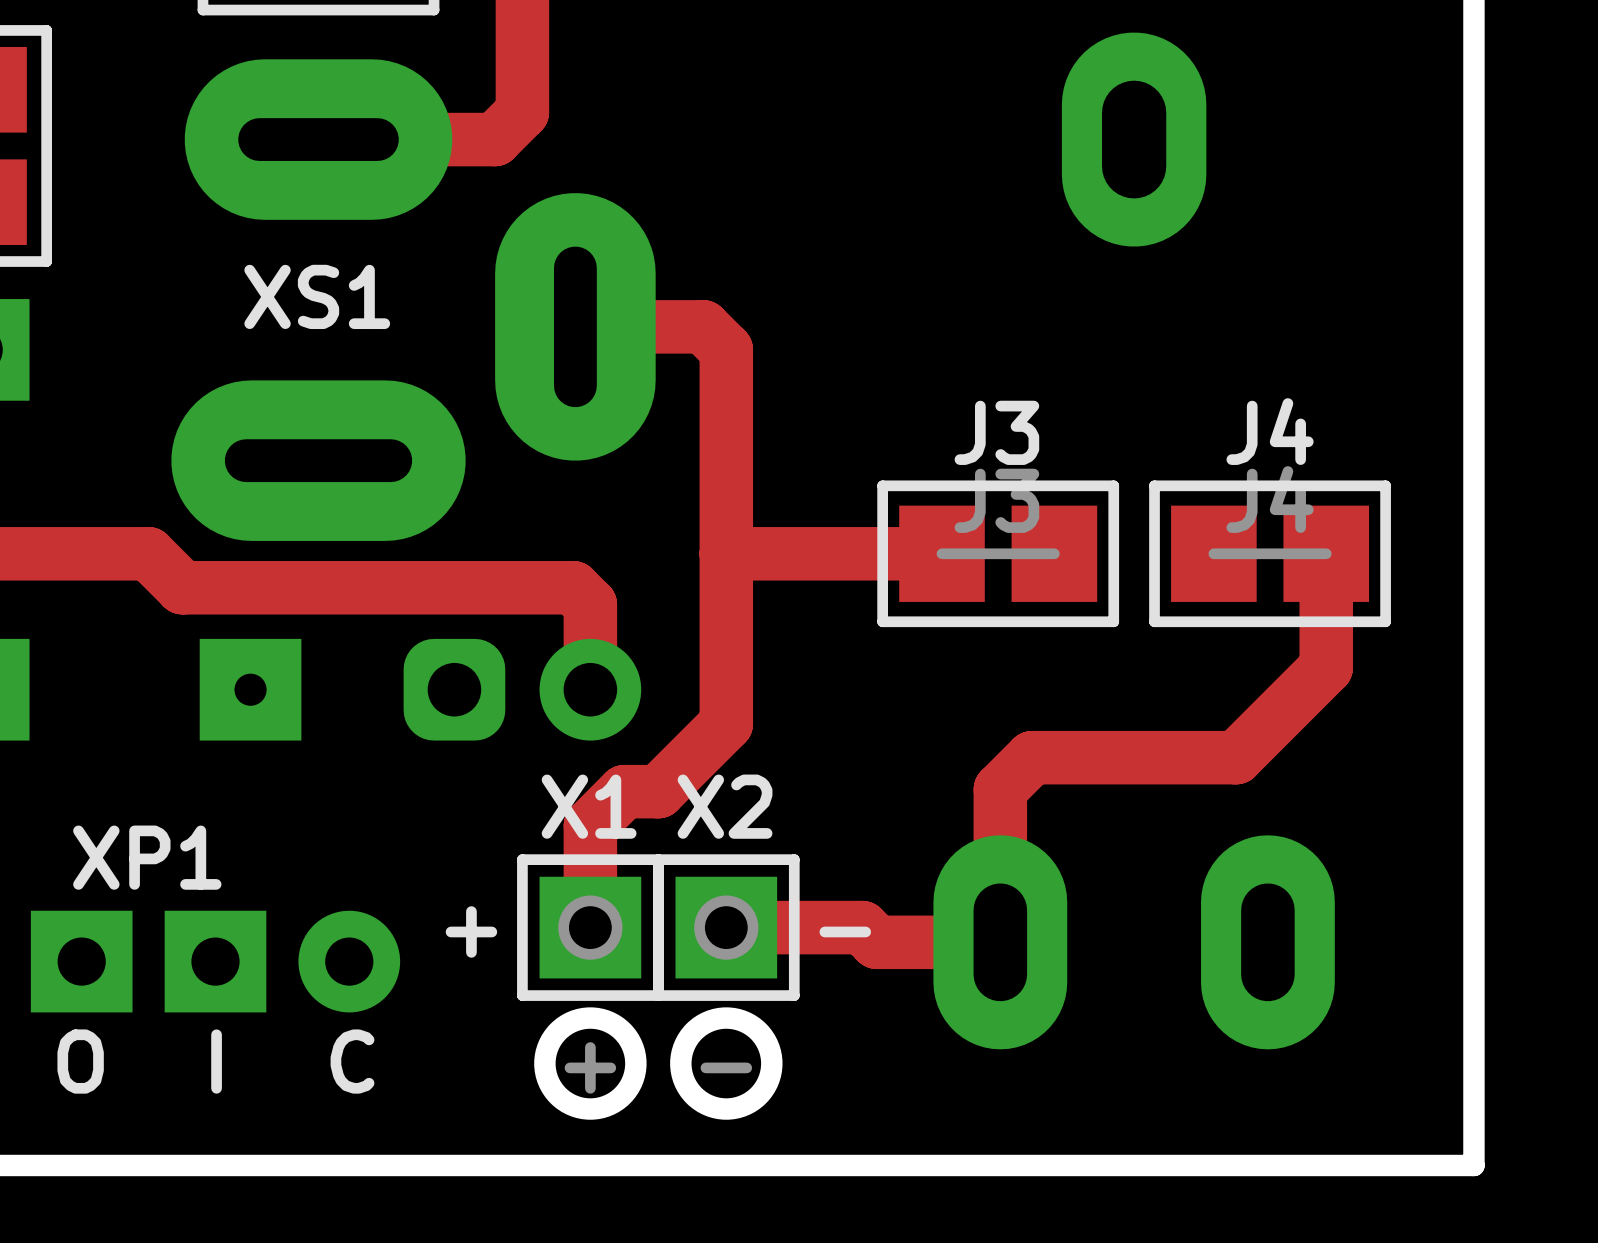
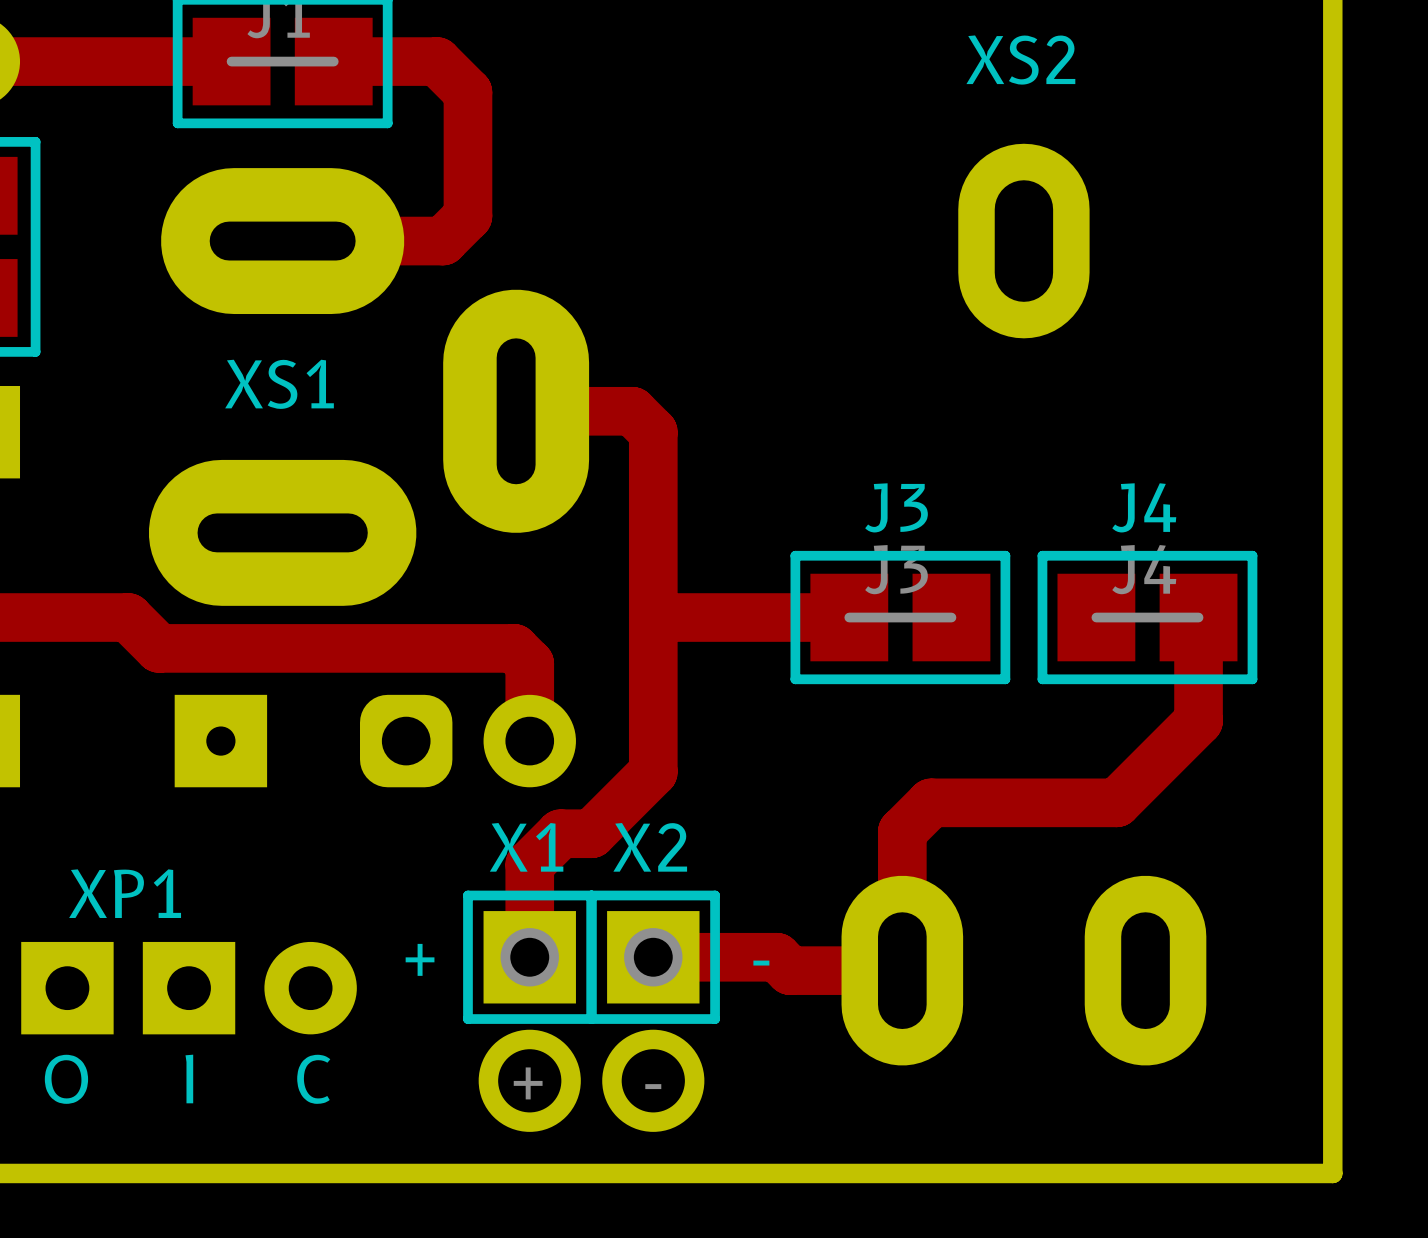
XS2 footprint: [933, 32, 1335, 1050] -> [841, 143, 1207, 1066]

